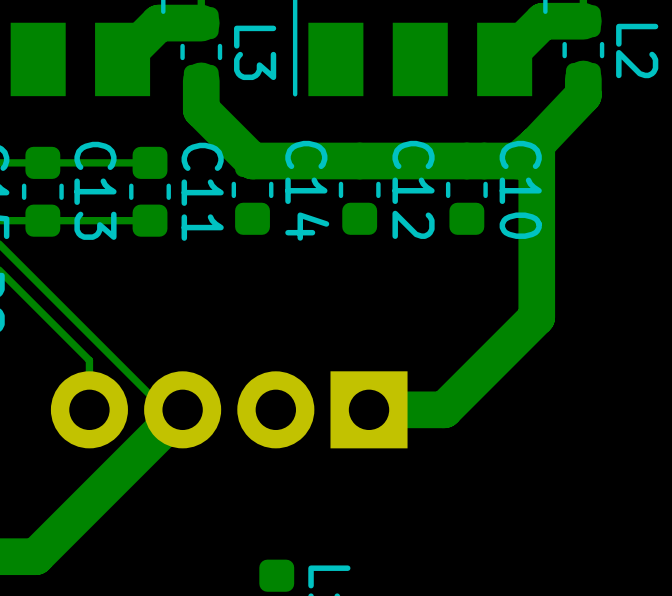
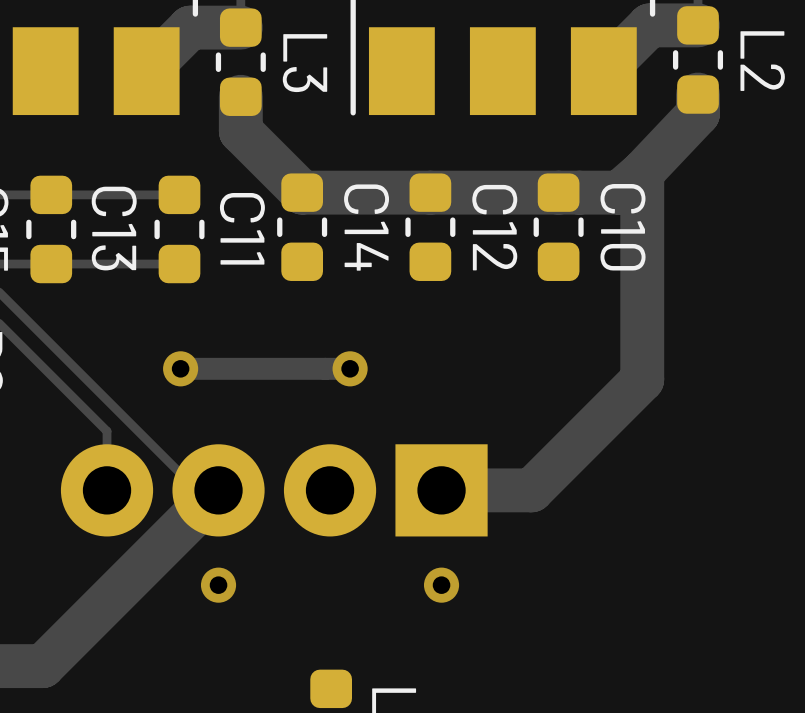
via: none -> (180, 368)
track: none -> (350, 368) (180, 368)
via: none -> (350, 368)
via: none -> (218, 585)
via: none -> (441, 585)

